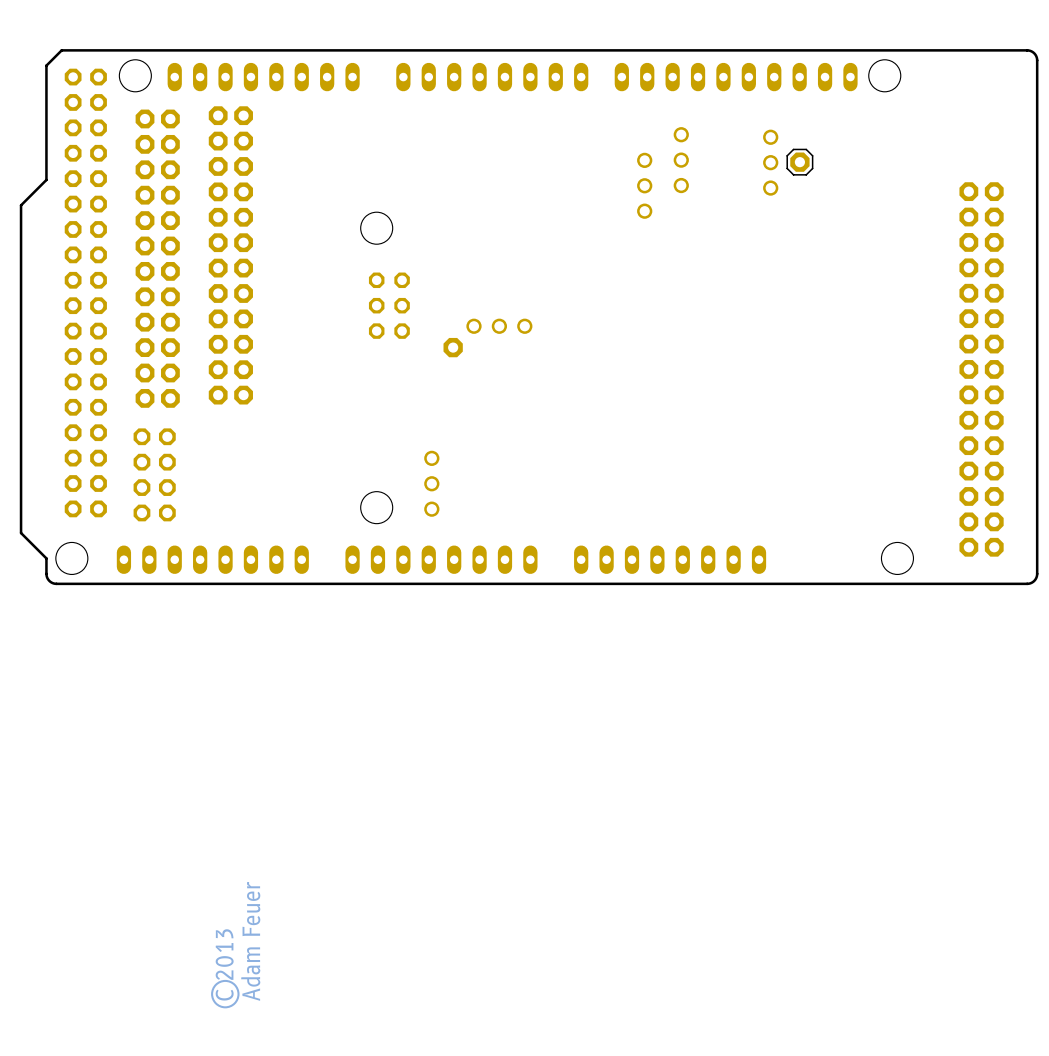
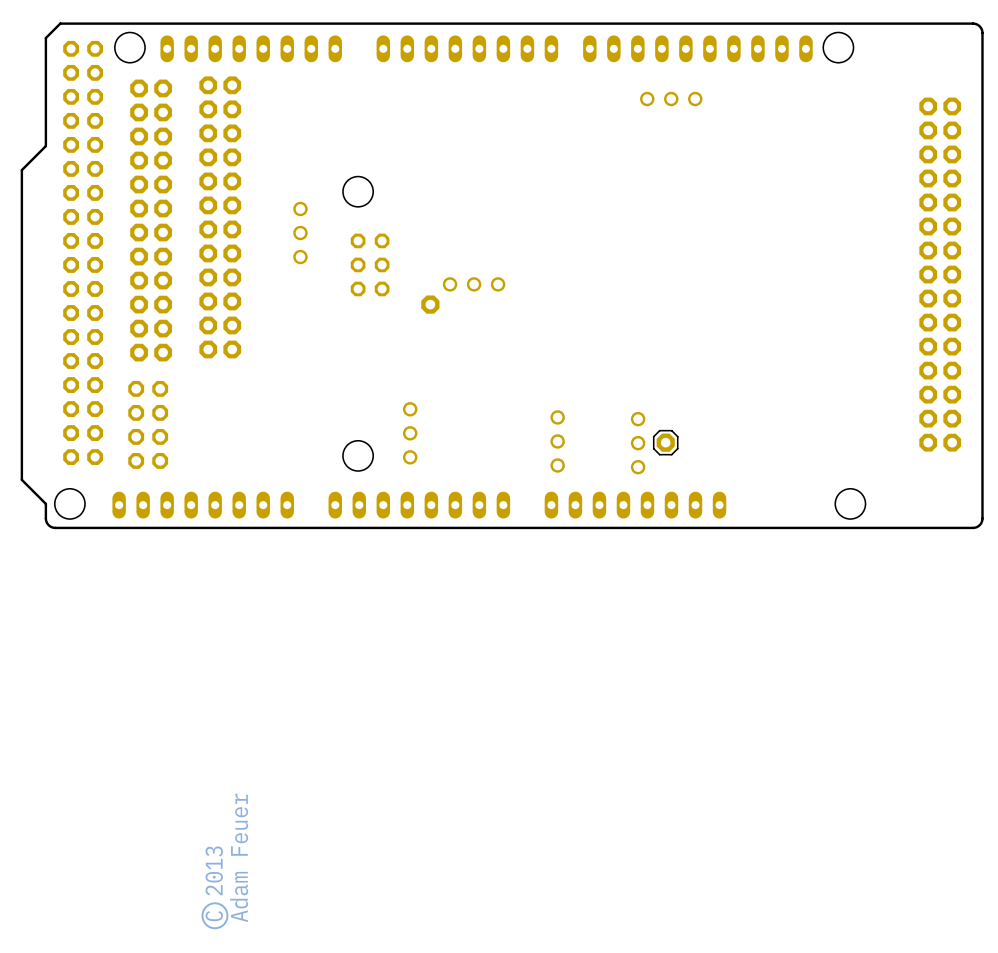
part: none -> (671, 99)
part: (681, 160) -> none
part: (770, 162) -> none
part: (799, 162) -> none
part: (644, 185) -> none
part: none -> (300, 233)
part position: (981, 369) -> (940, 274)
part: none -> (557, 441)
part: none -> (665, 442)
part: none -> (638, 443)

